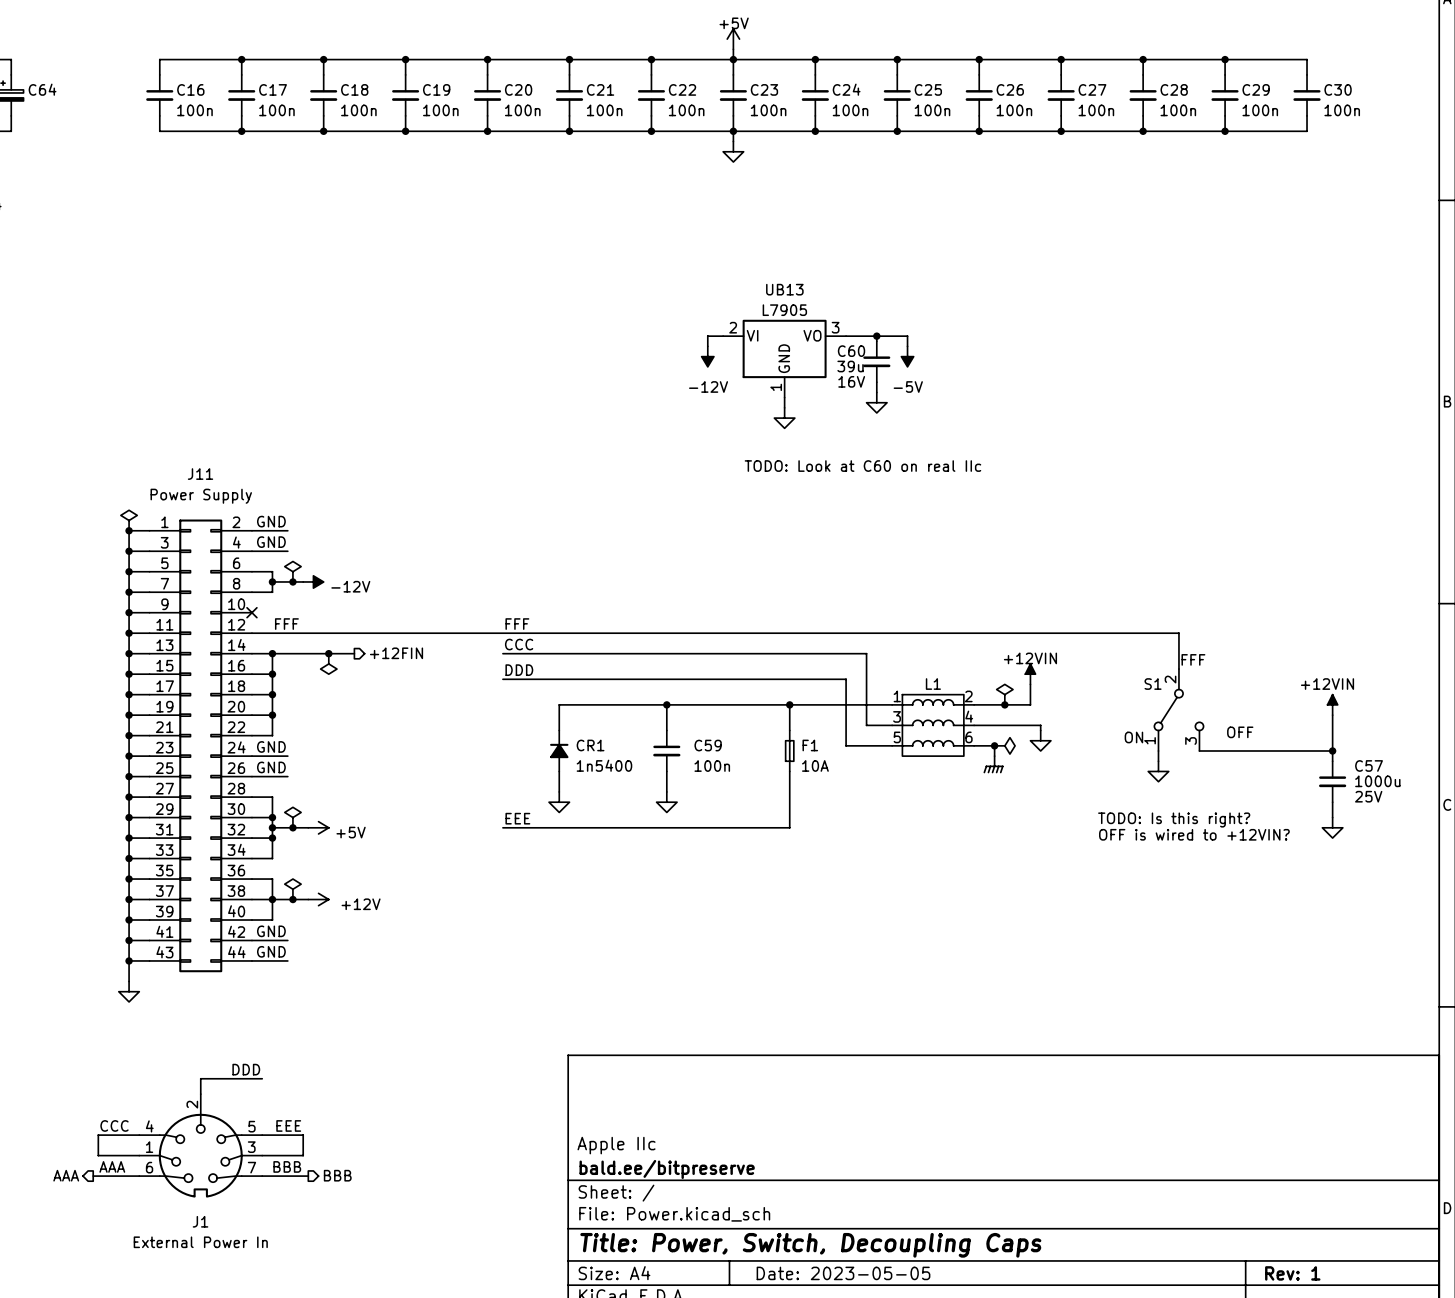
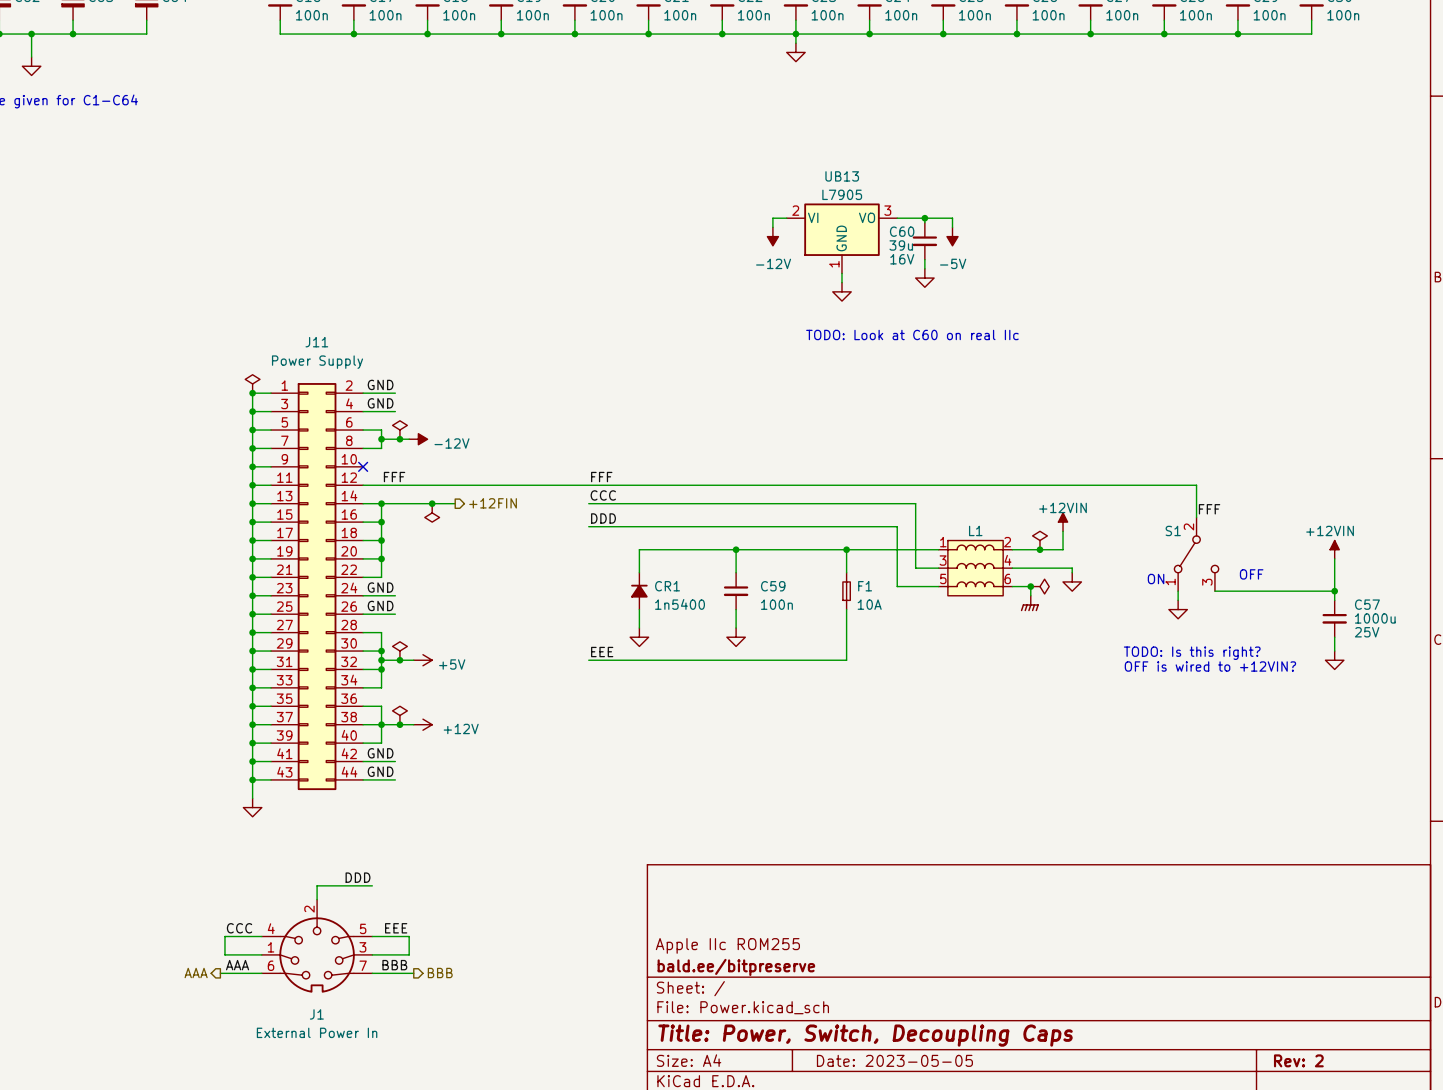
title block: Apple IIc (616, 1145) -> Apple IIc ROM255 (727, 945)
title block: Rev: 1 (1292, 1273) -> Rev: 2 (1298, 1060)

